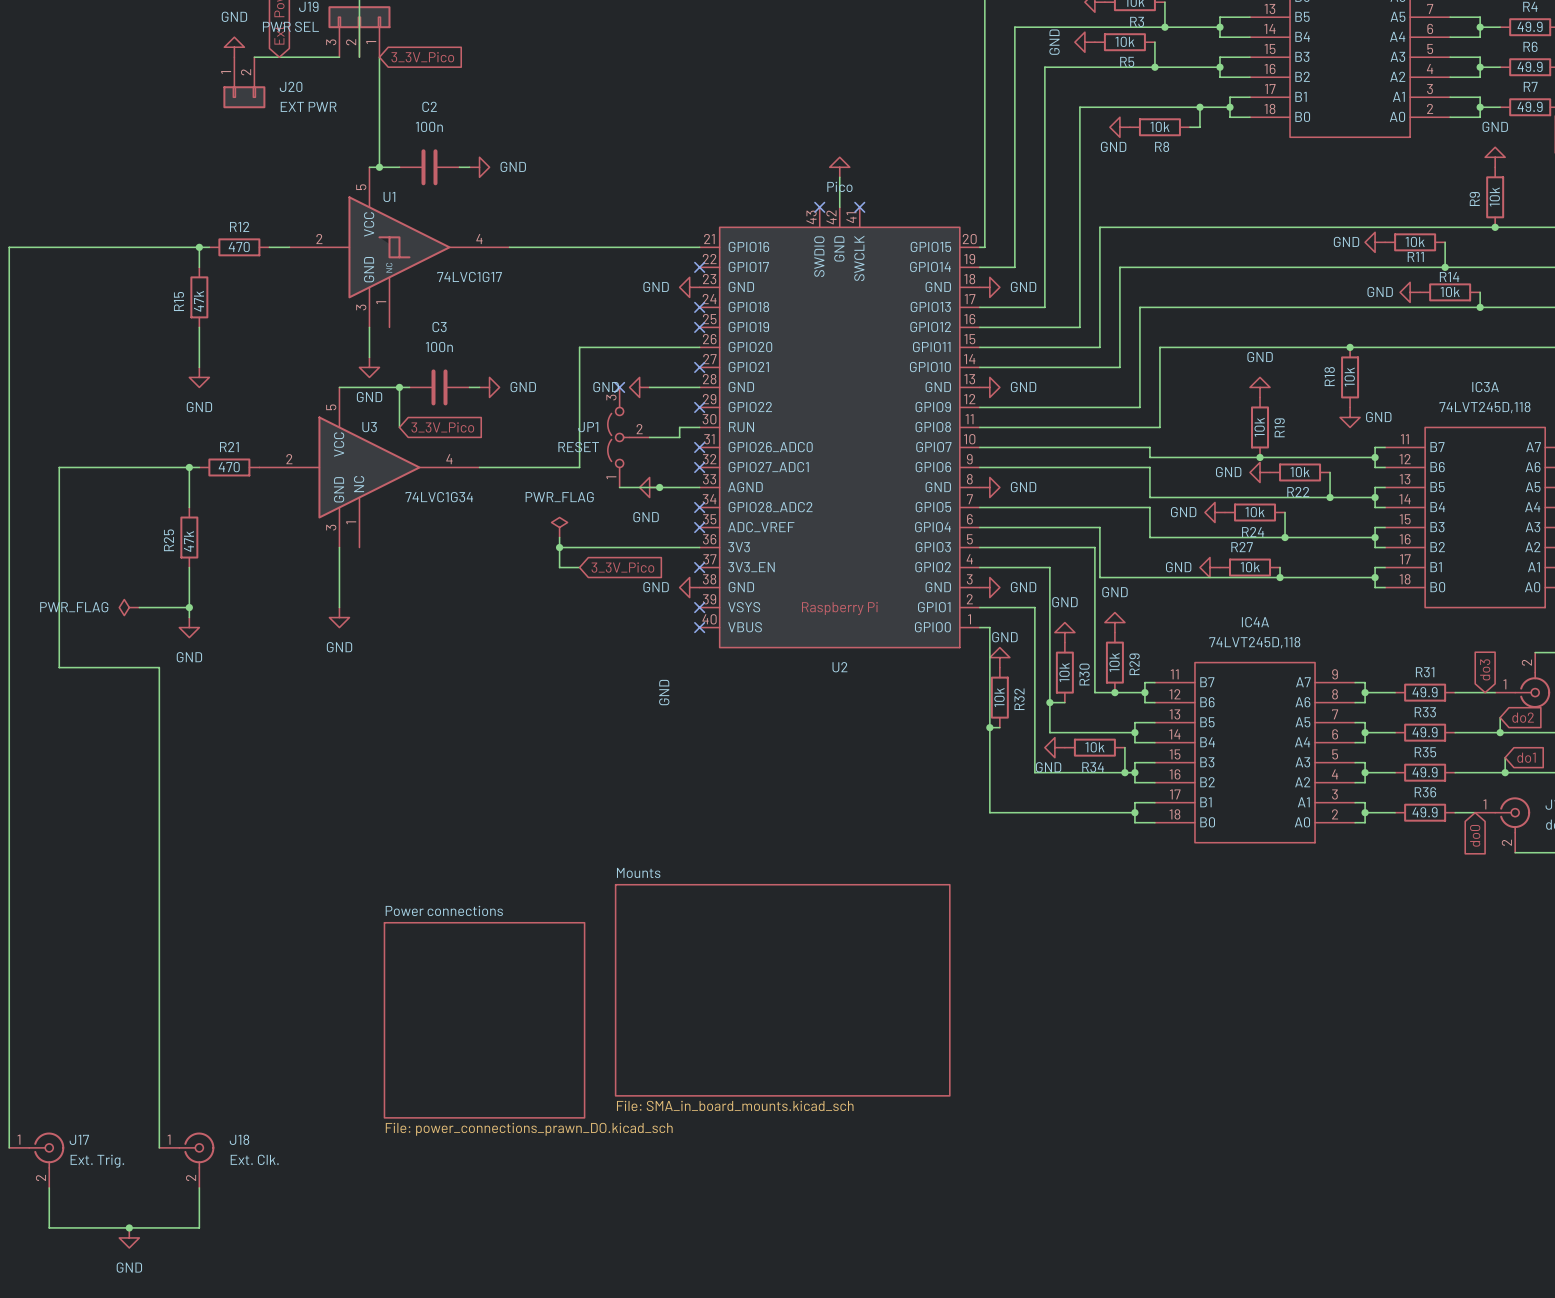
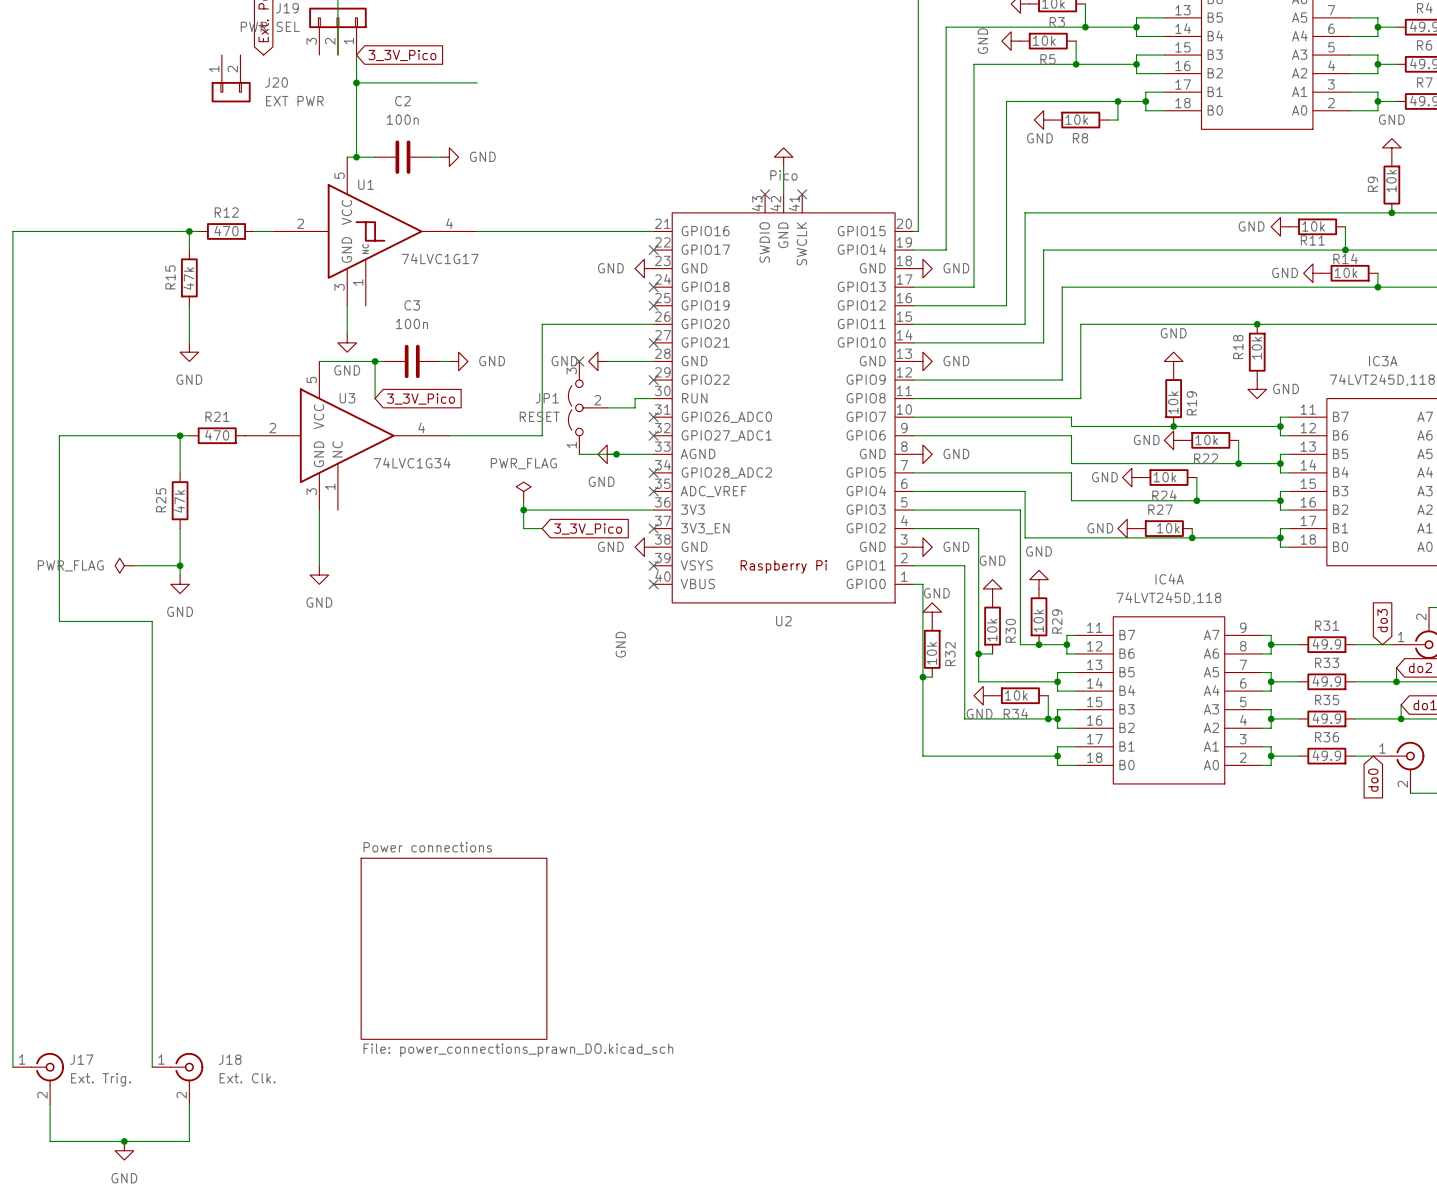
power symbol: GND (234, 47) -> none
wire: (254, 57) (339, 57) -> none
wire: none -> (356, 82) (477, 82)
junction: none -> (356, 82)
sheet Mounts: File: SMA_in_board_mounts.kicad_sch (782, 990) -> none

